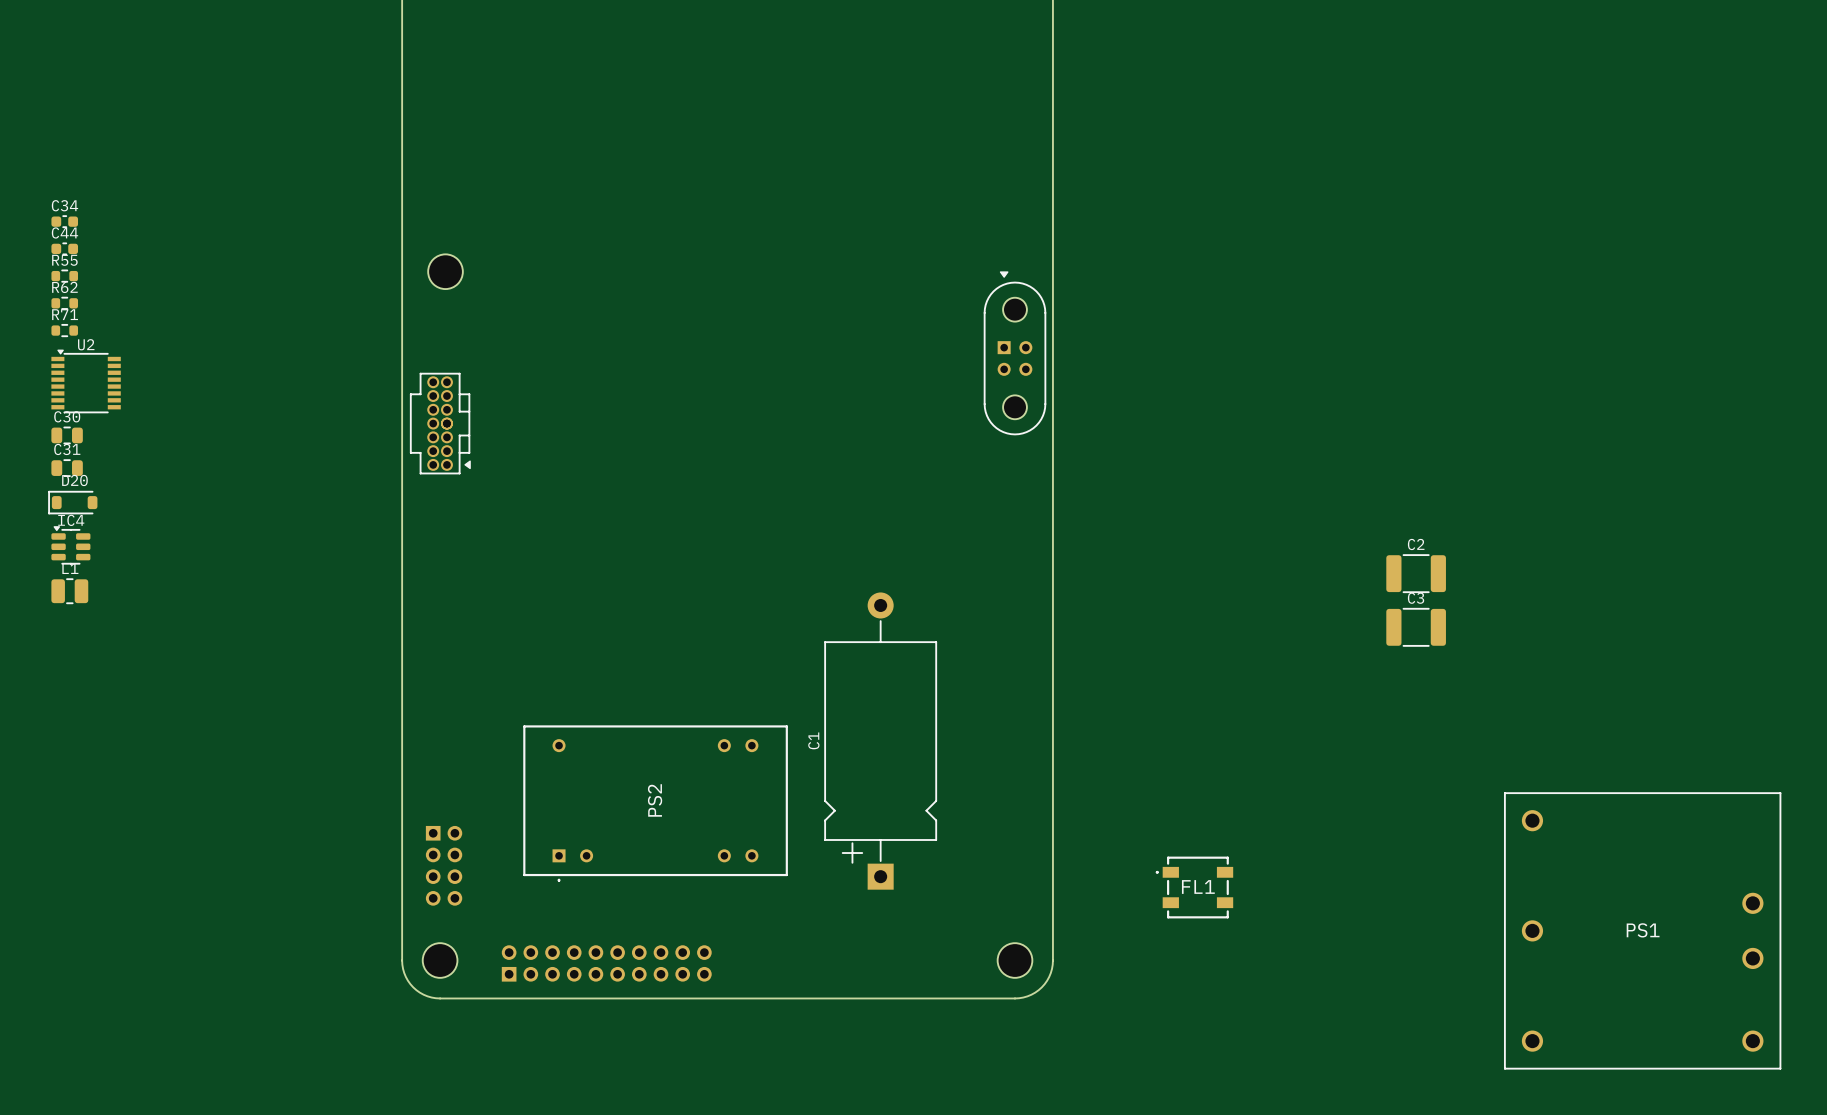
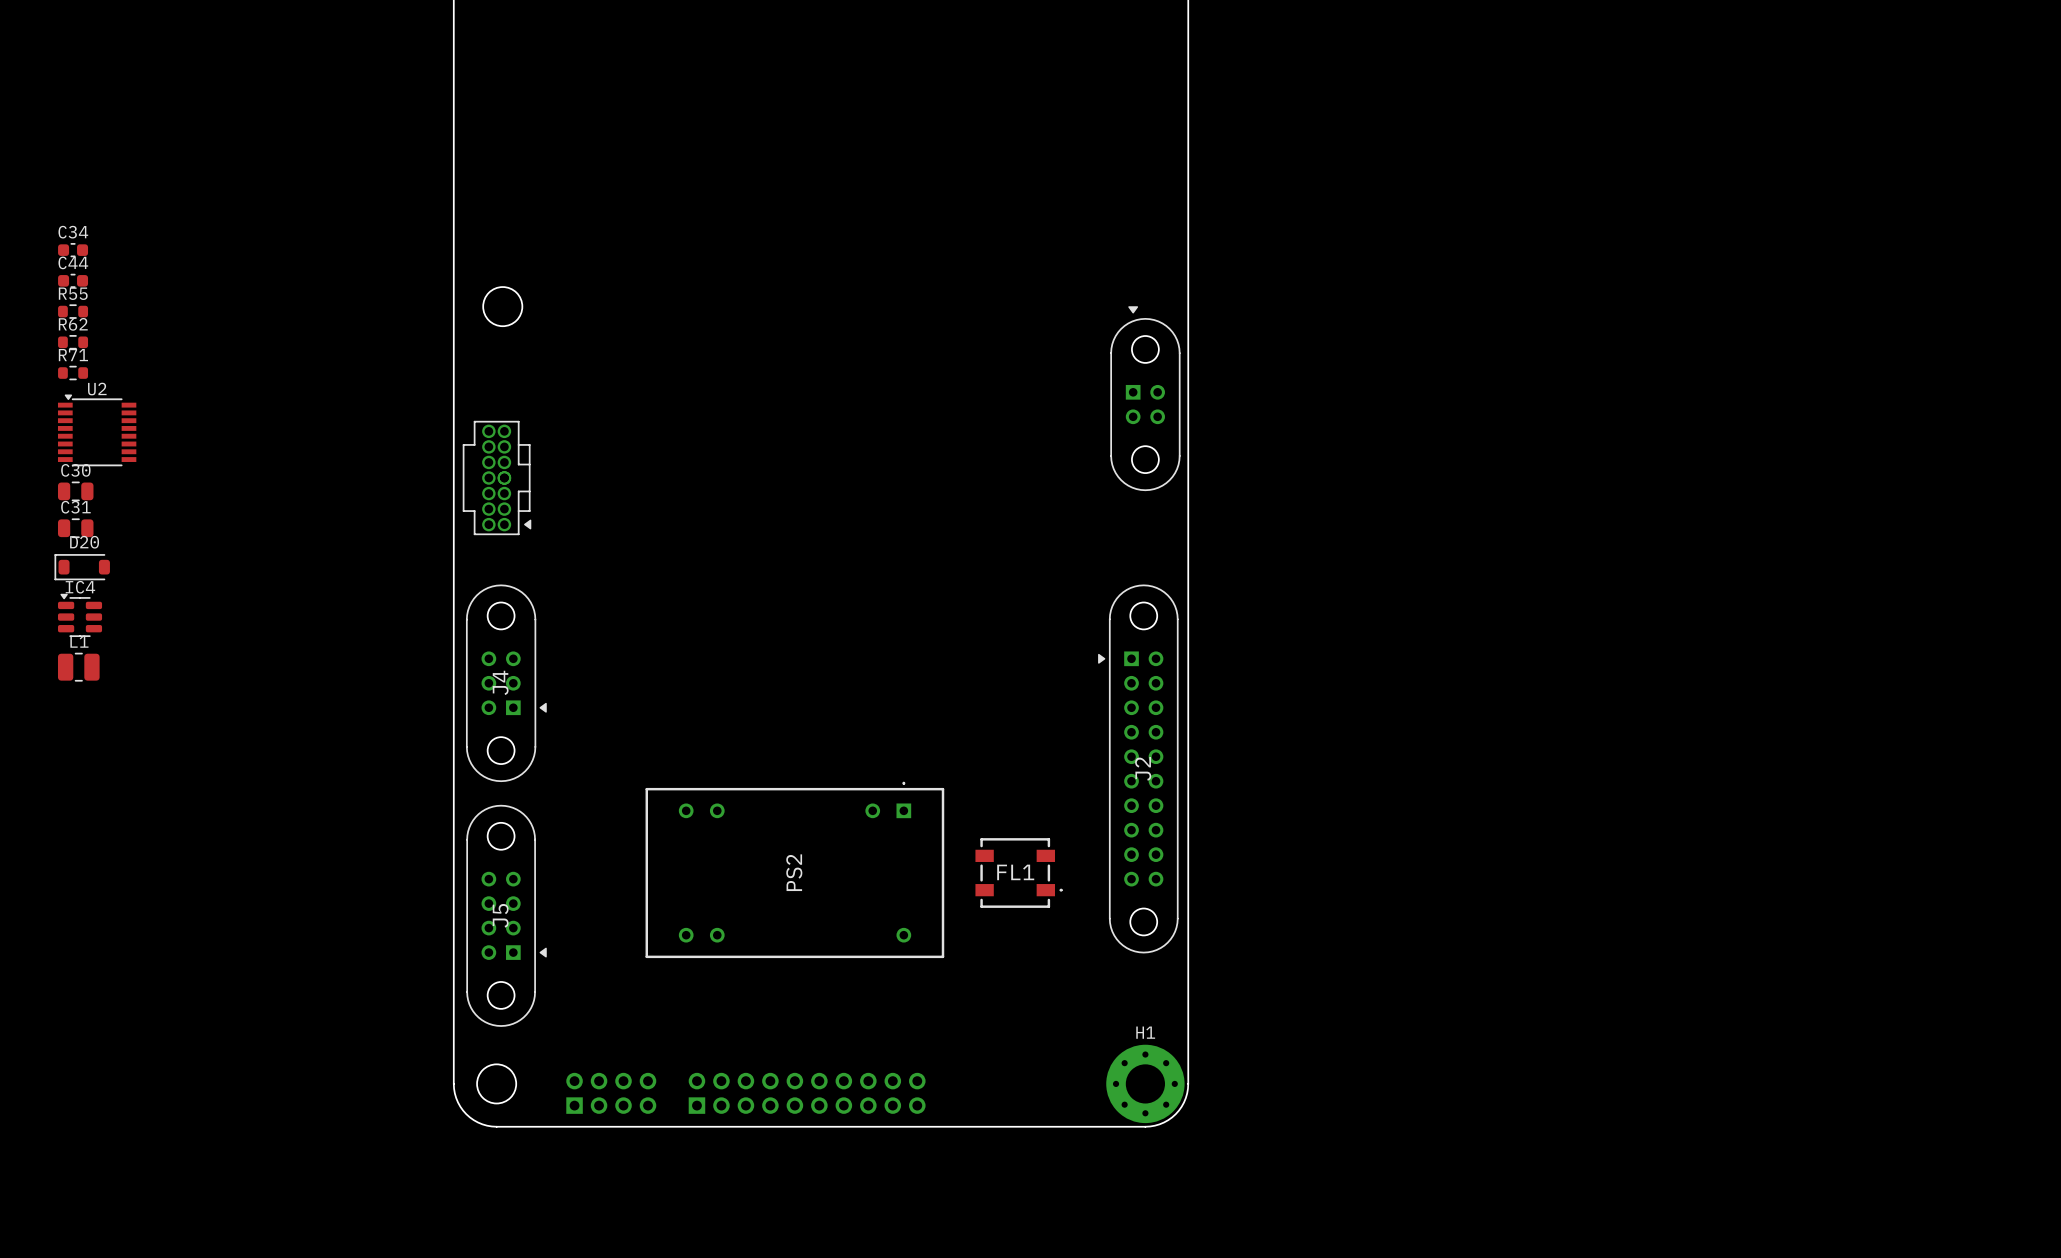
C2: (1416, 573) -> none
J4: none -> (506, 683)
C3: (1416, 627) -> none
J2: none -> (1138, 768)
C1: (880, 741) -> none
PS2 rotation: 0° (655, 803) -> 180° (794, 870)
J5: none -> (506, 915)
part rotation: 0° (444, 865) -> 90° counterclockwise (611, 1093)
part position: (444, 865) -> (611, 1093)
FL1 rotation: 0° (1194, 887) -> 180° (1018, 873)
FL1 position: (1194, 887) -> (1018, 873)
PS1: (1642, 930) -> none
part: (1015, 960) -> none
H1: none -> (1145, 1083)
part position: (606, 963) -> (807, 1093)

